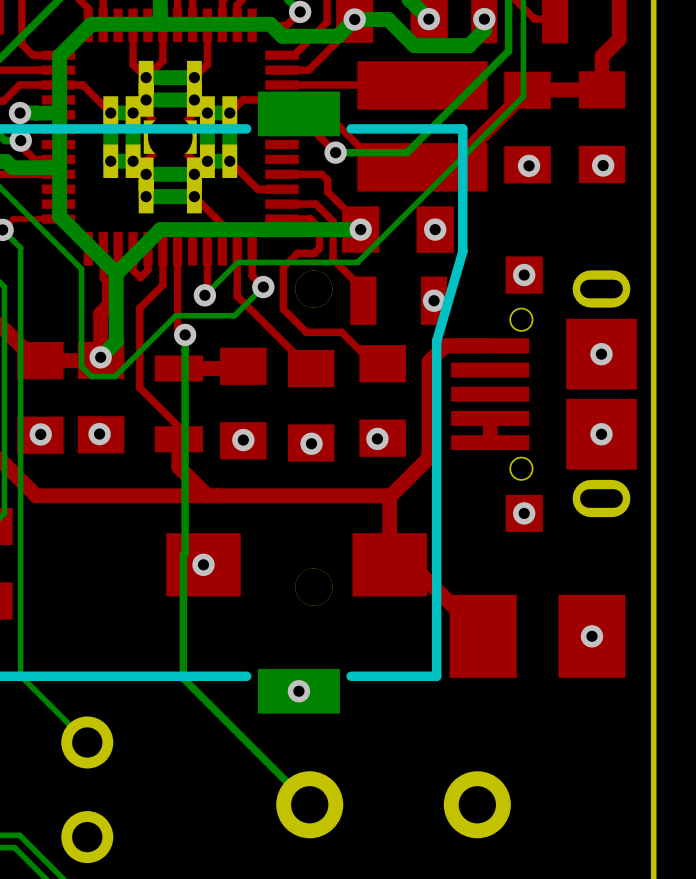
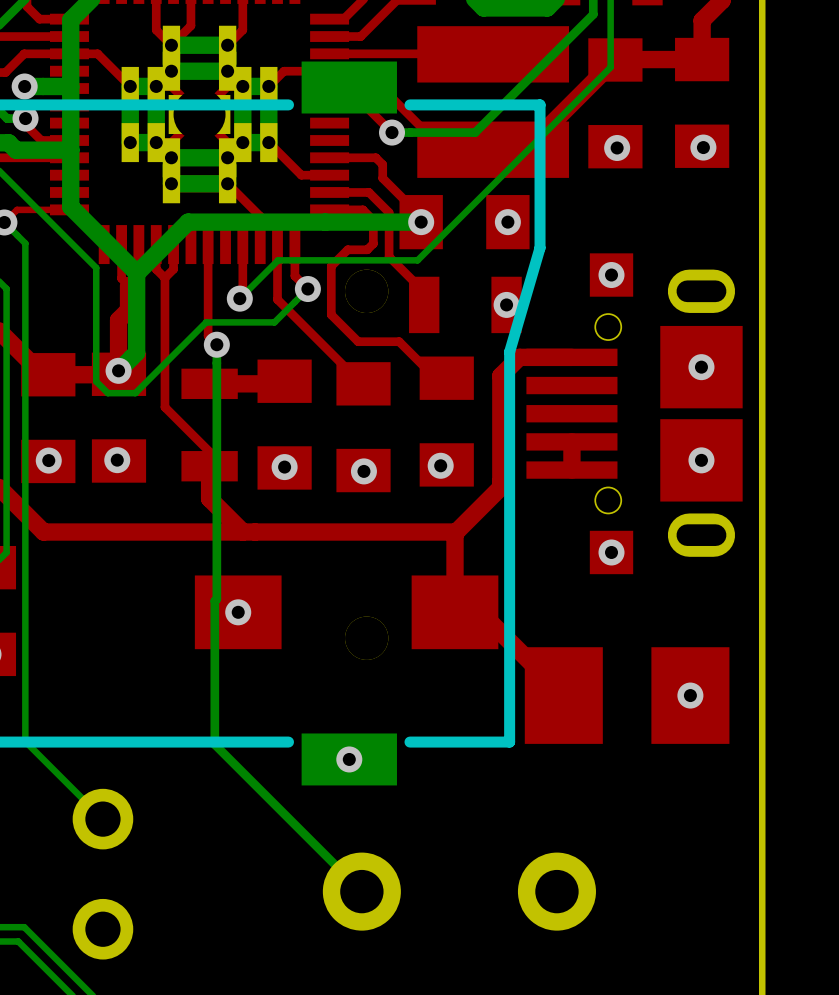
top track: (162, 248) (162, 285) (139, 308) (140, 388) -> (164, 278) (164, 407)

